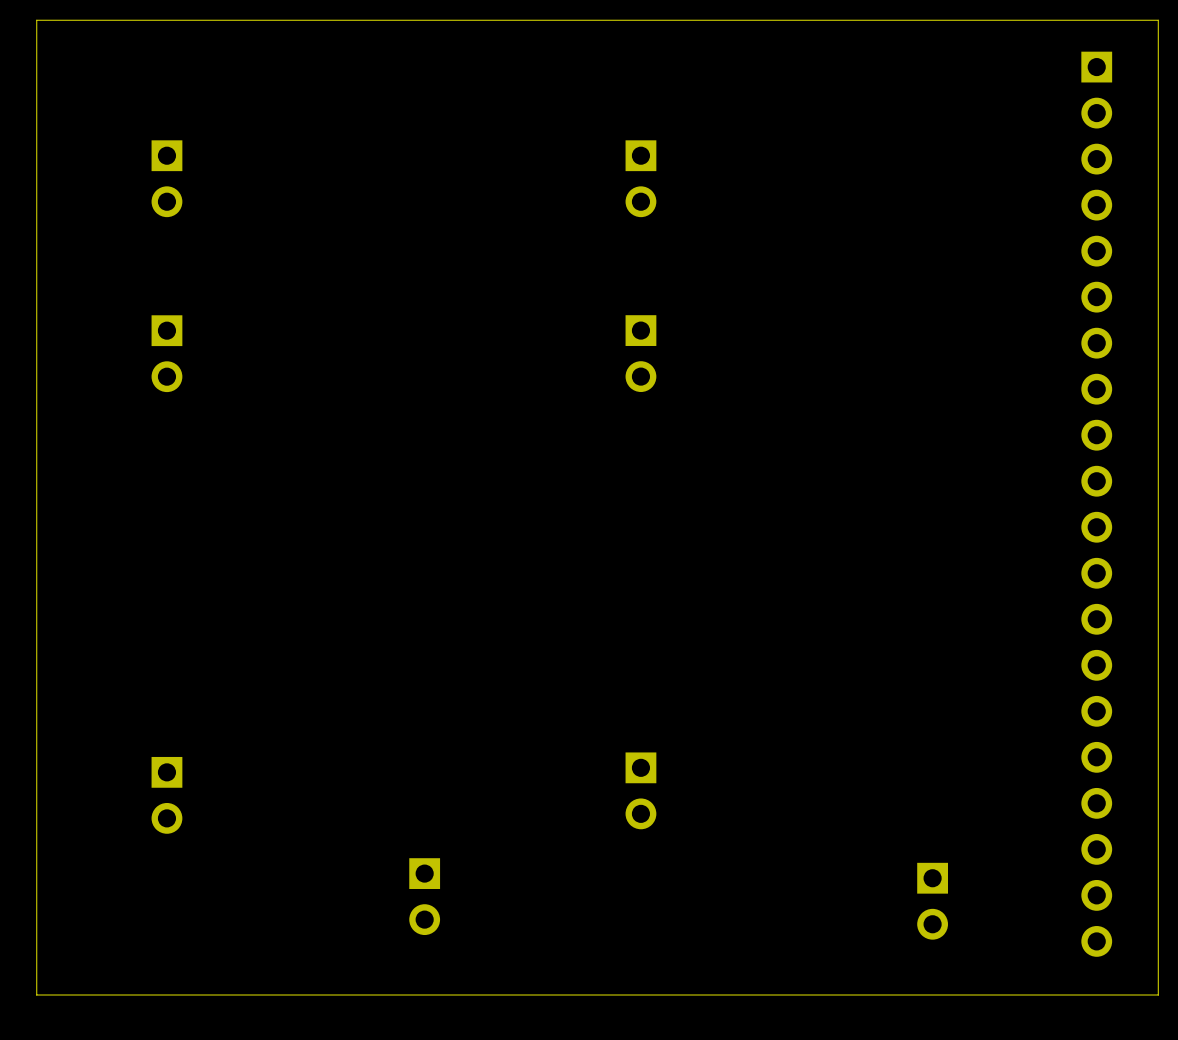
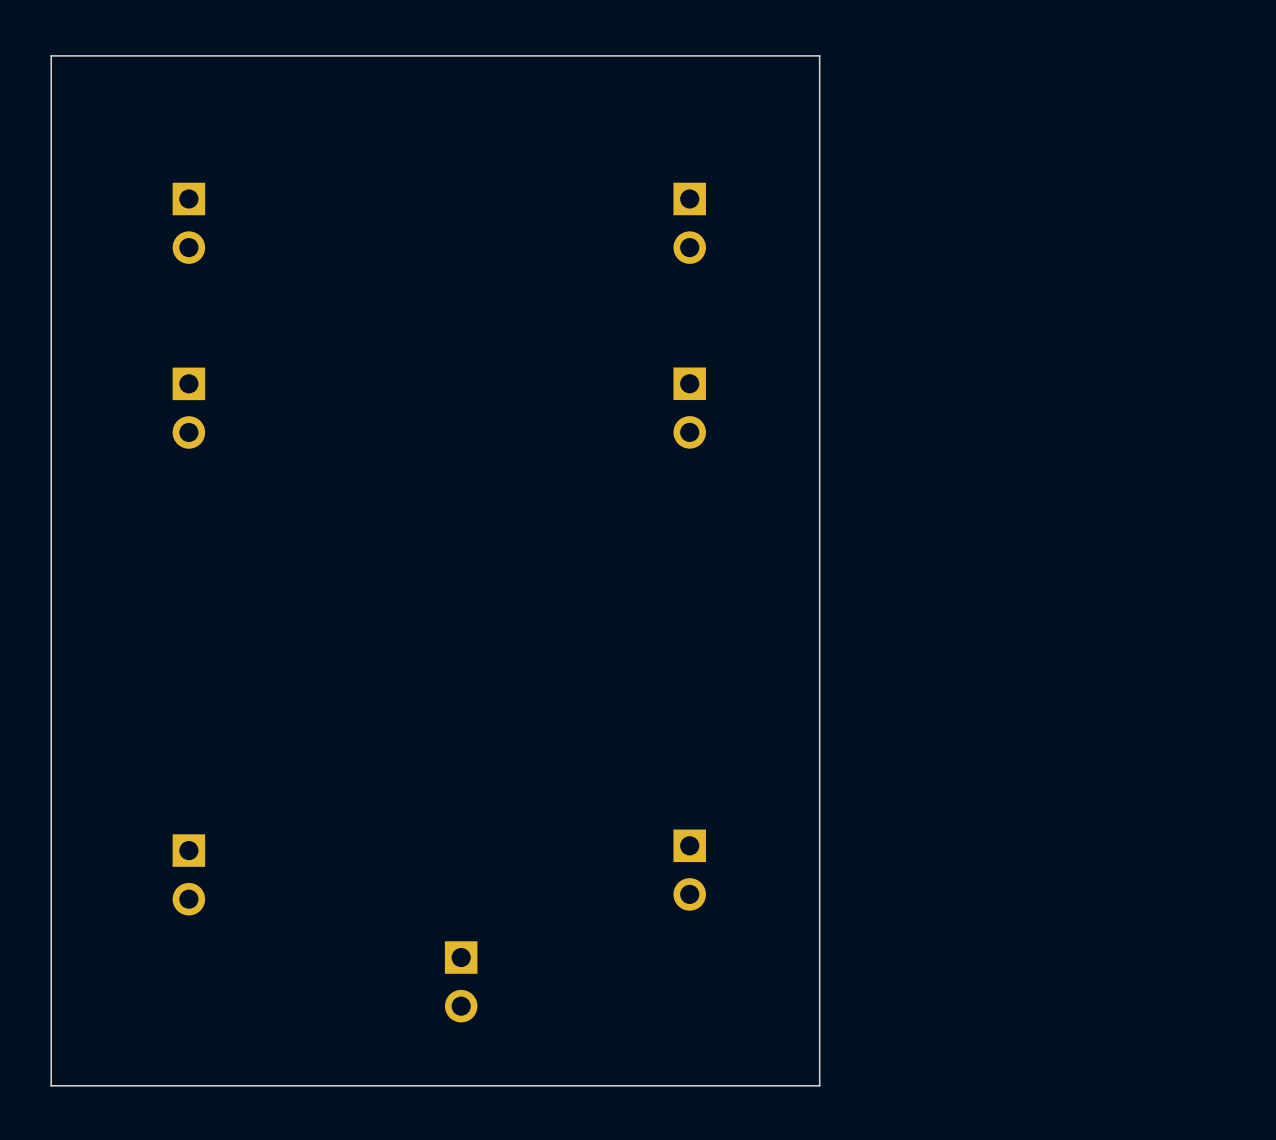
board edge: (763, 20) (1158, 20) (1158, 995) (763, 995) -> (819, 55) (819, 1085)
part: (1096, 504) -> none
part: (932, 901) -> none

